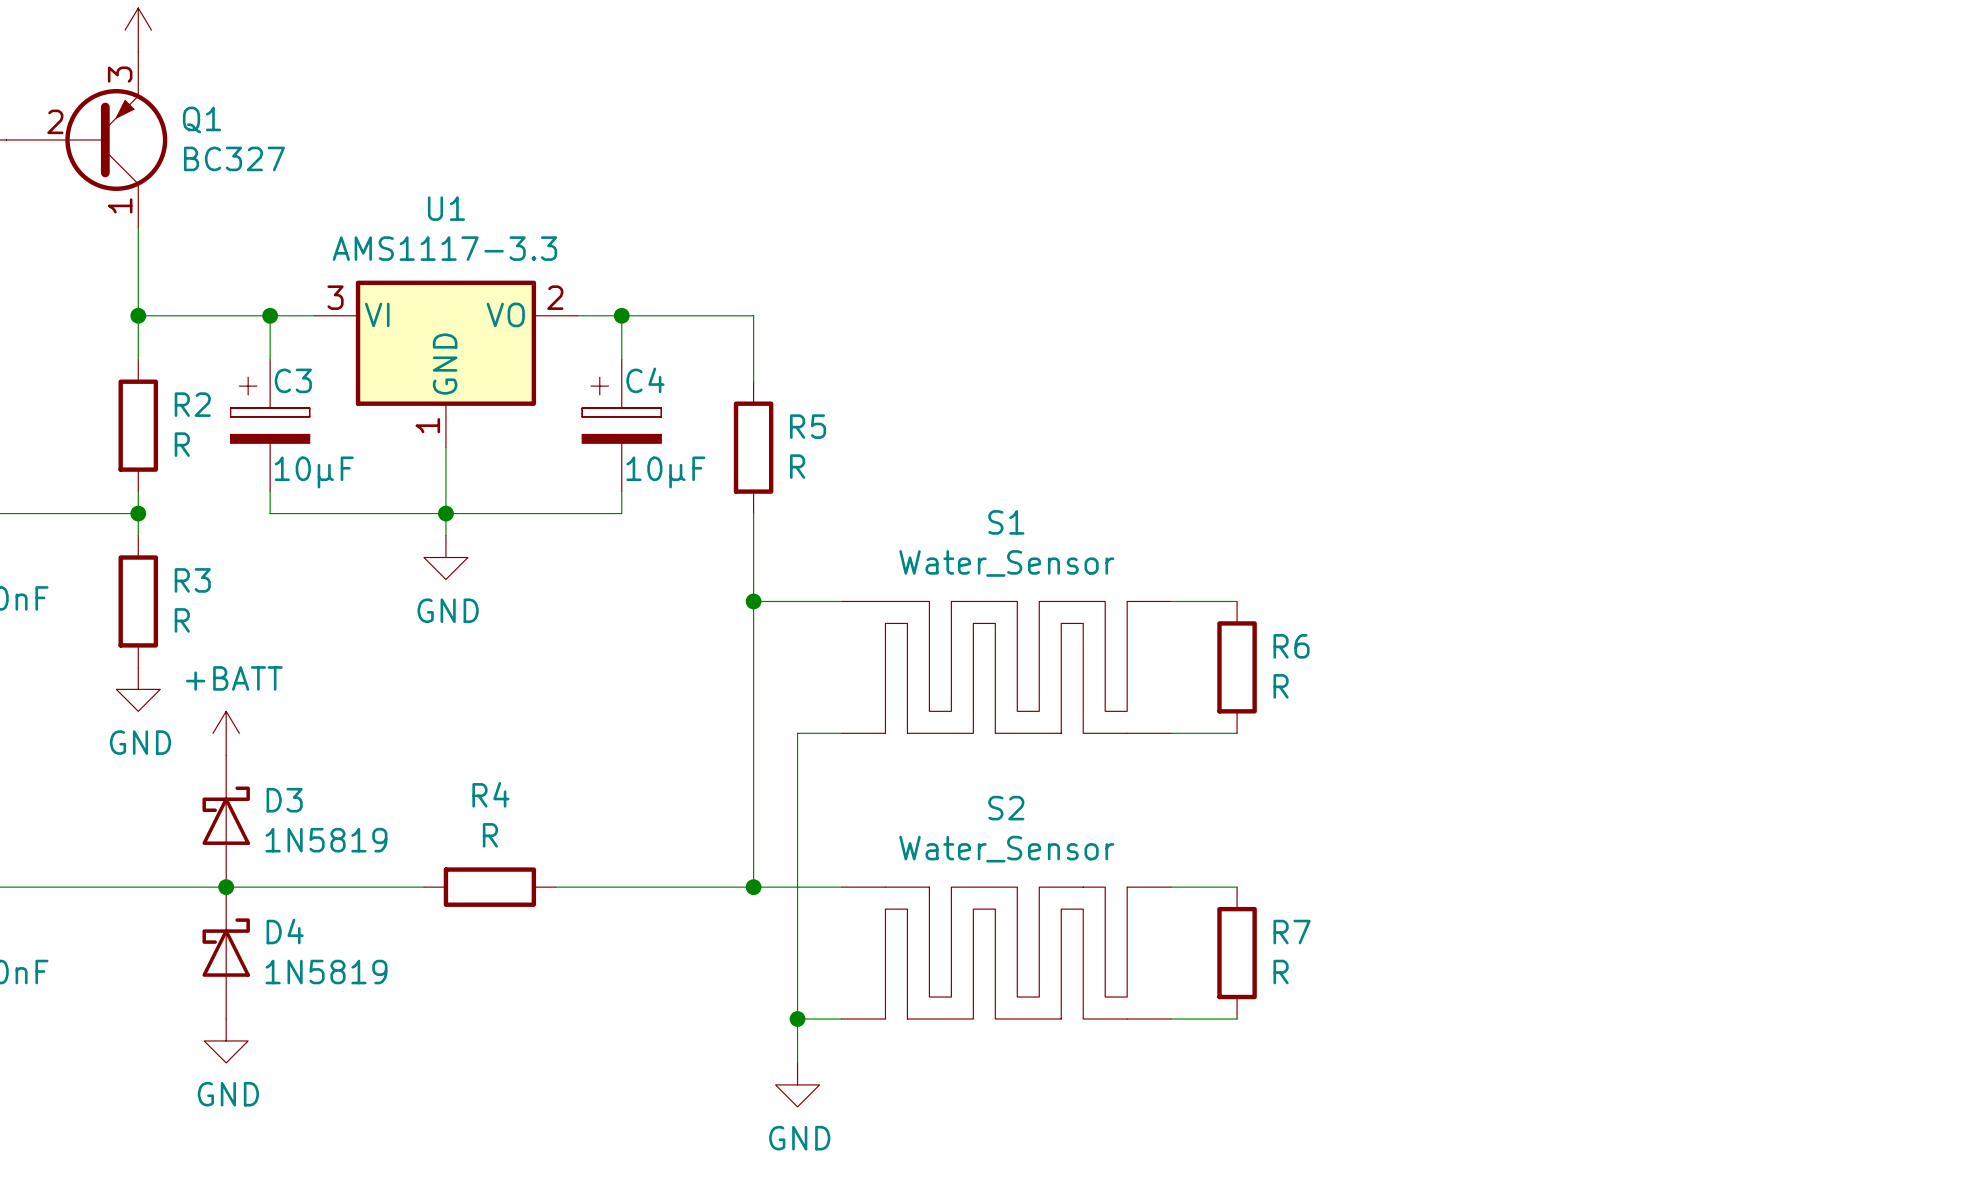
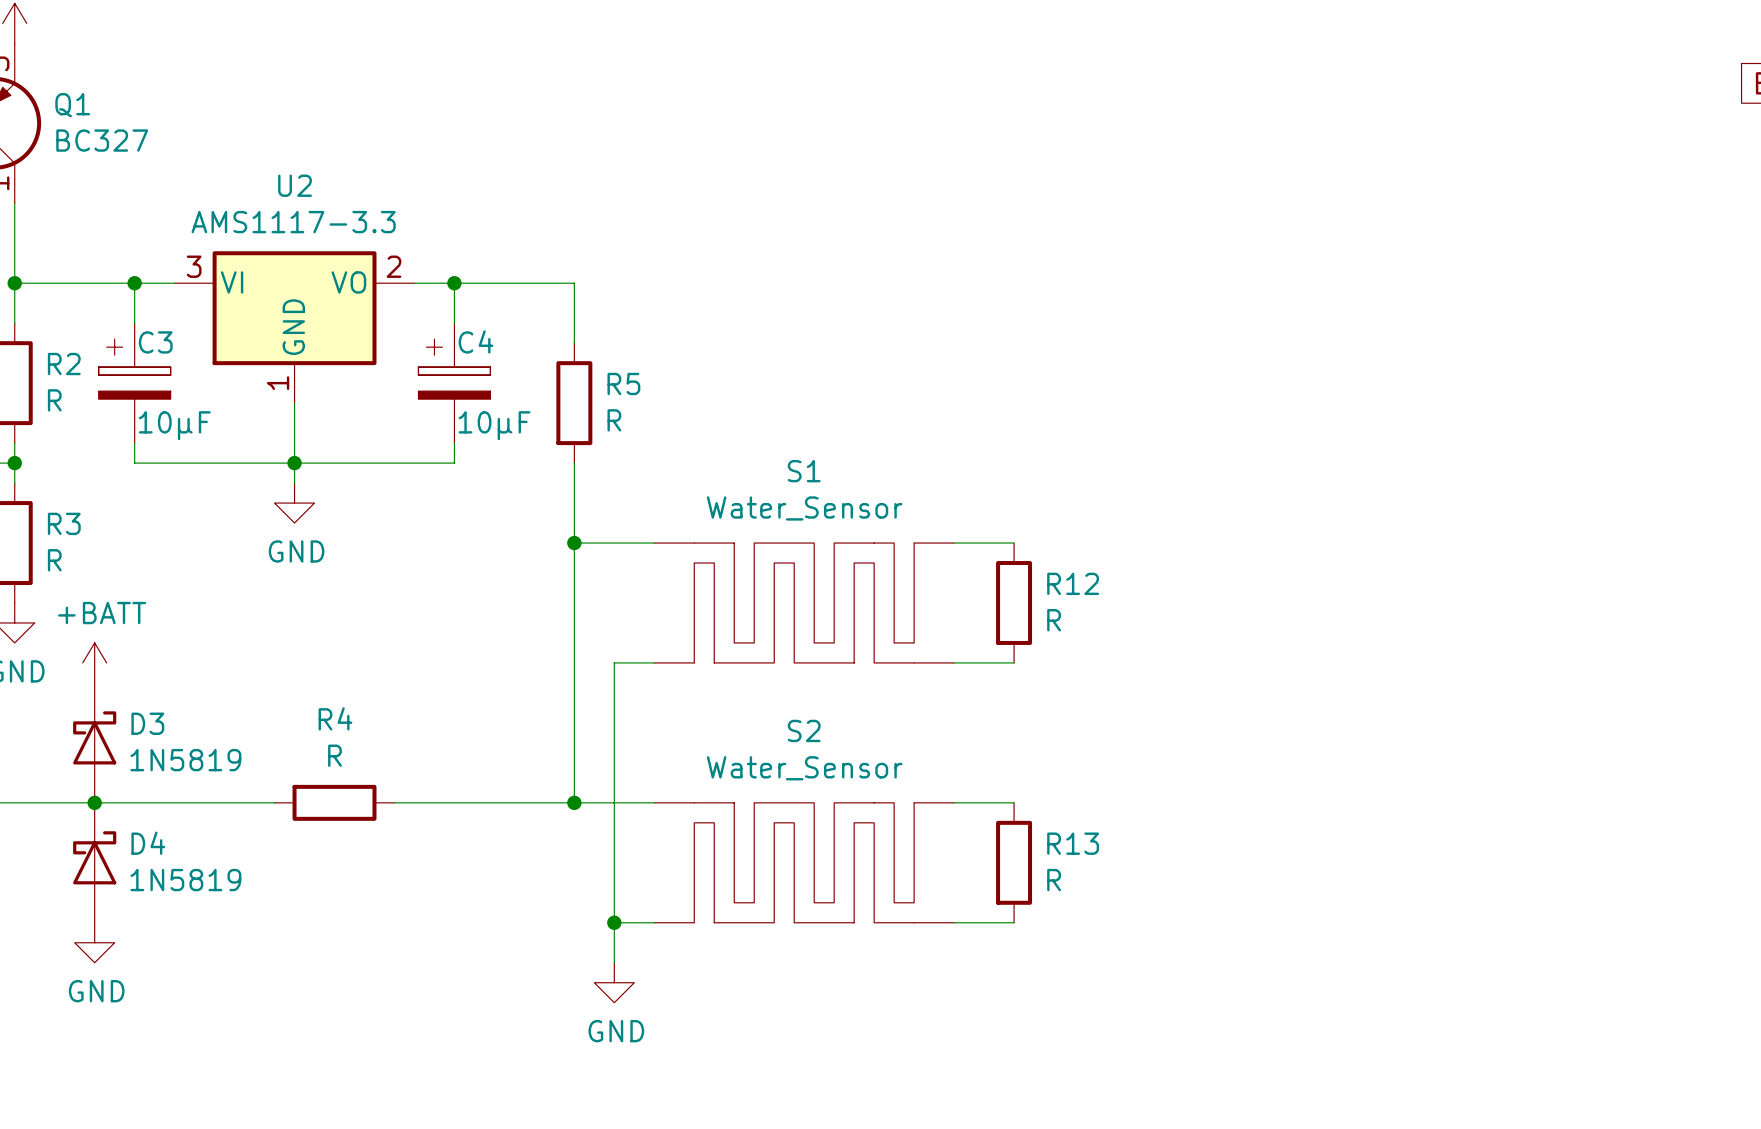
U1 name: U1 (446, 208) -> U2 (295, 185)
R6 name: R6 (1291, 646) -> R12 (1073, 583)
R7 name: R7 (1292, 932) -> R13 (1073, 843)

